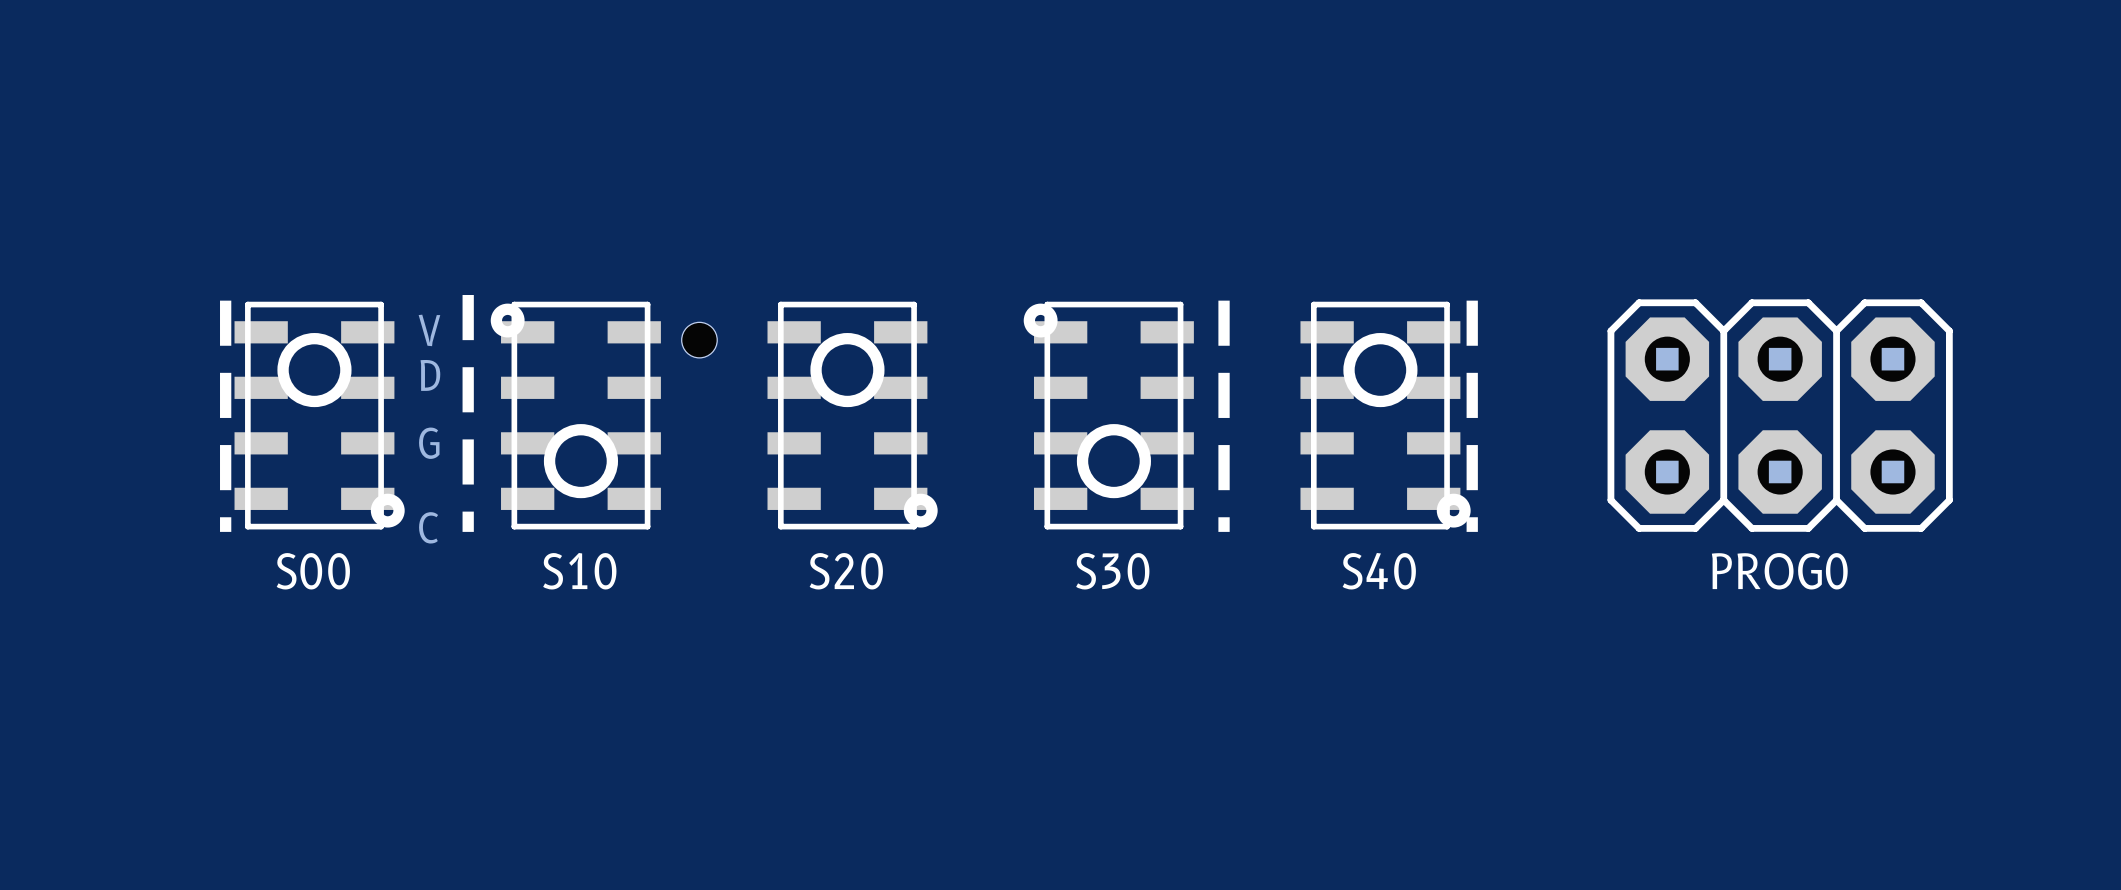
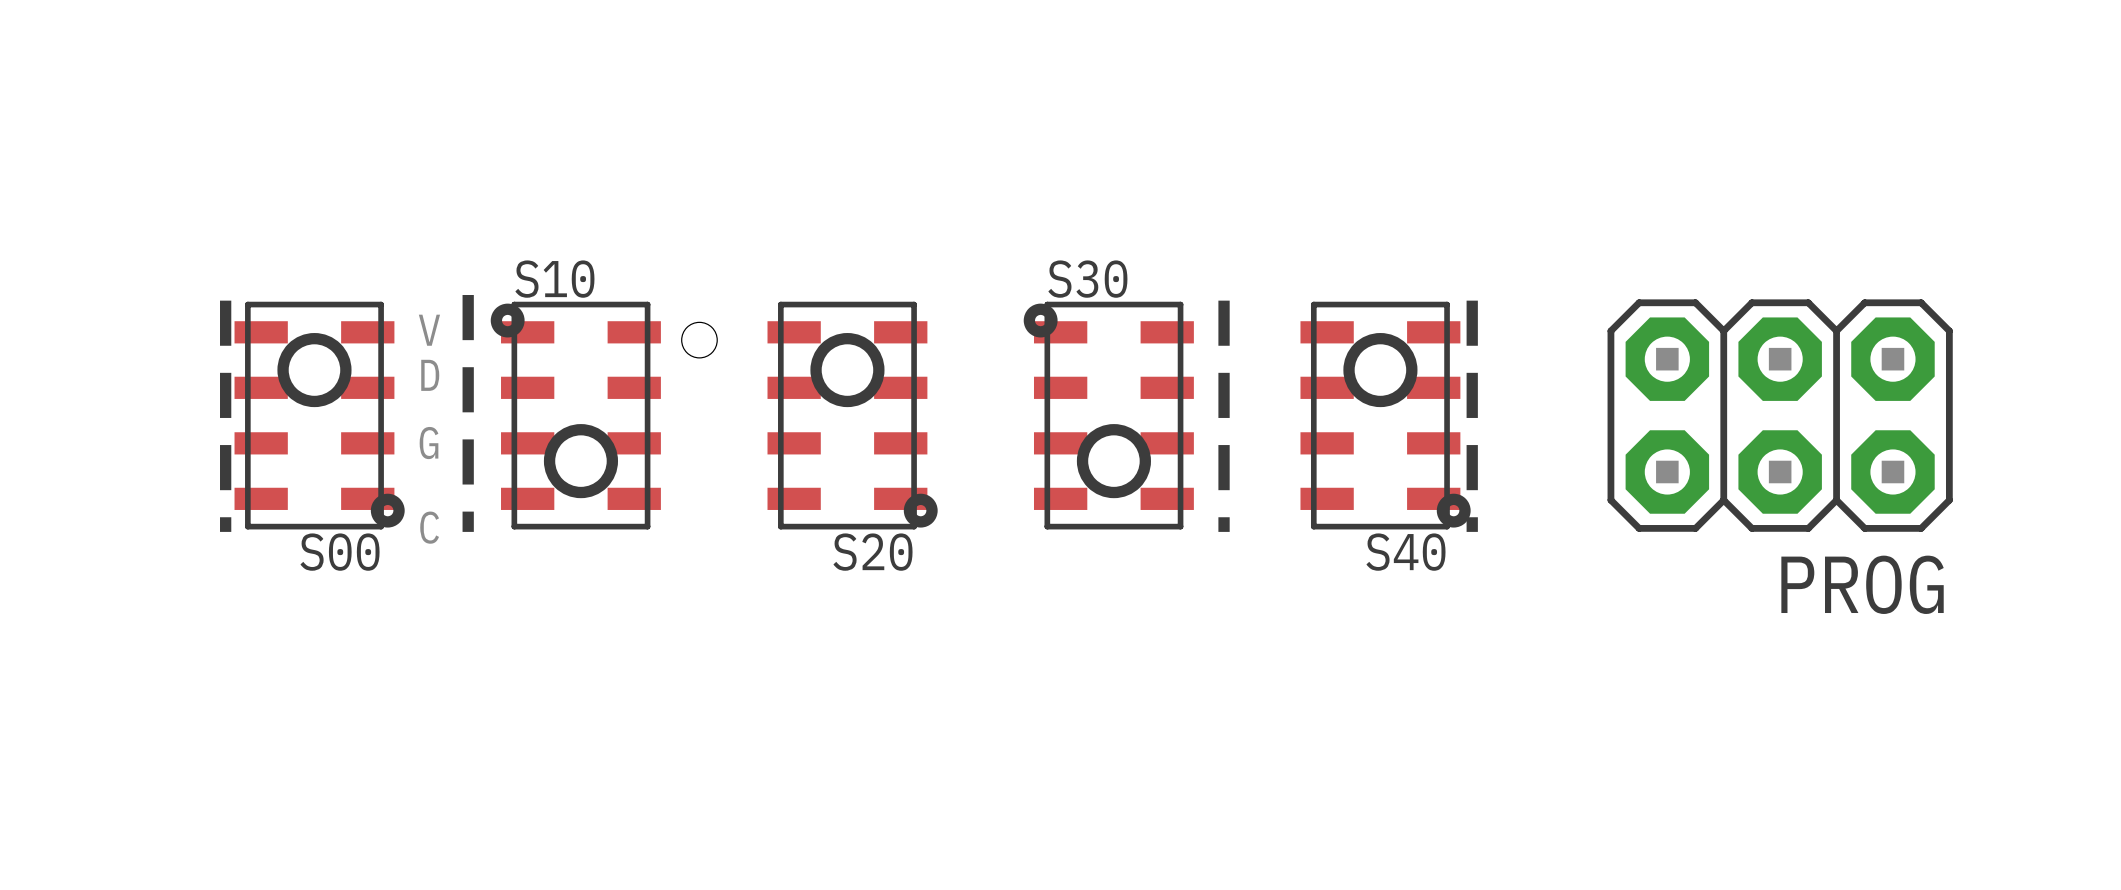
S00 name position: S00 (313, 571) -> S00 (340, 552)
S10 name position: S10 (579, 571) -> S10 (554, 279)
S20 name position: S20 (846, 571) -> S20 (872, 552)
S30 name position: S30 (1112, 571) -> S30 (1087, 279)
S40 name position: S40 (1379, 571) -> S40 (1405, 552)
PROG0 name: PROG0 (1779, 571) -> PROG (1862, 584)

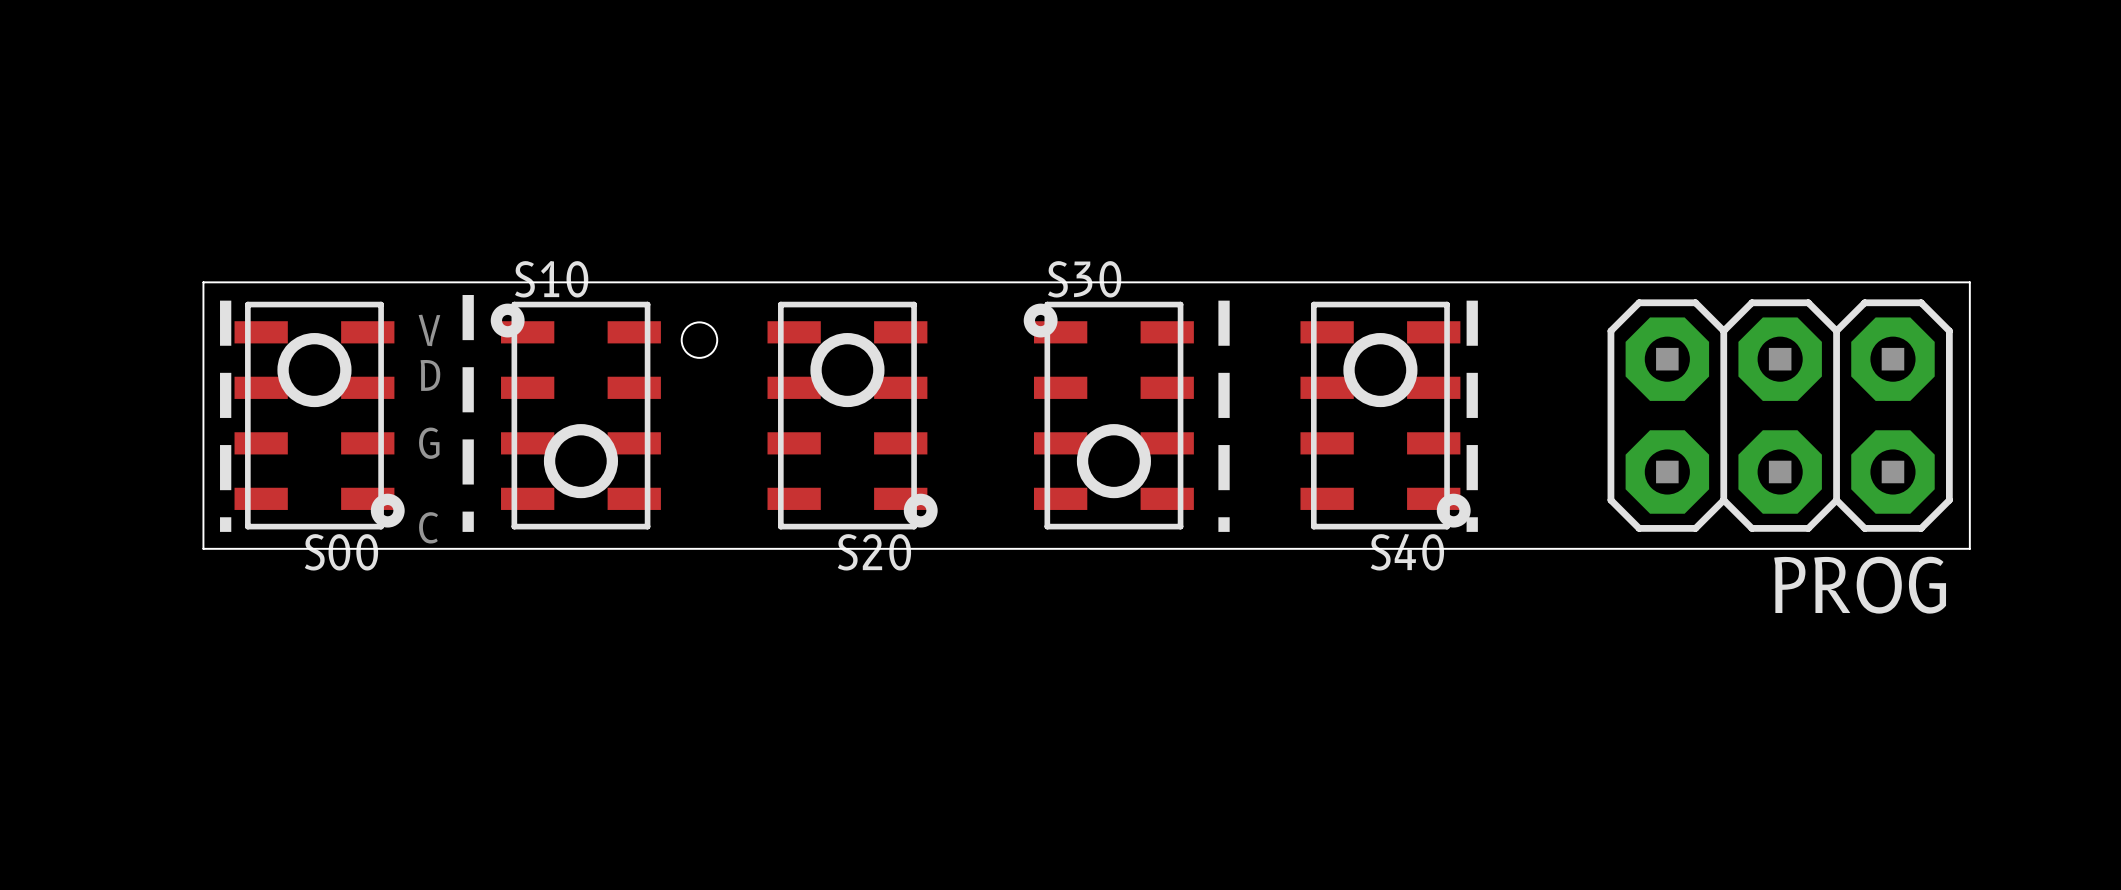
board edge: none -> (203, 282) (1969, 282) (1969, 548) (203, 548) (203, 282)

